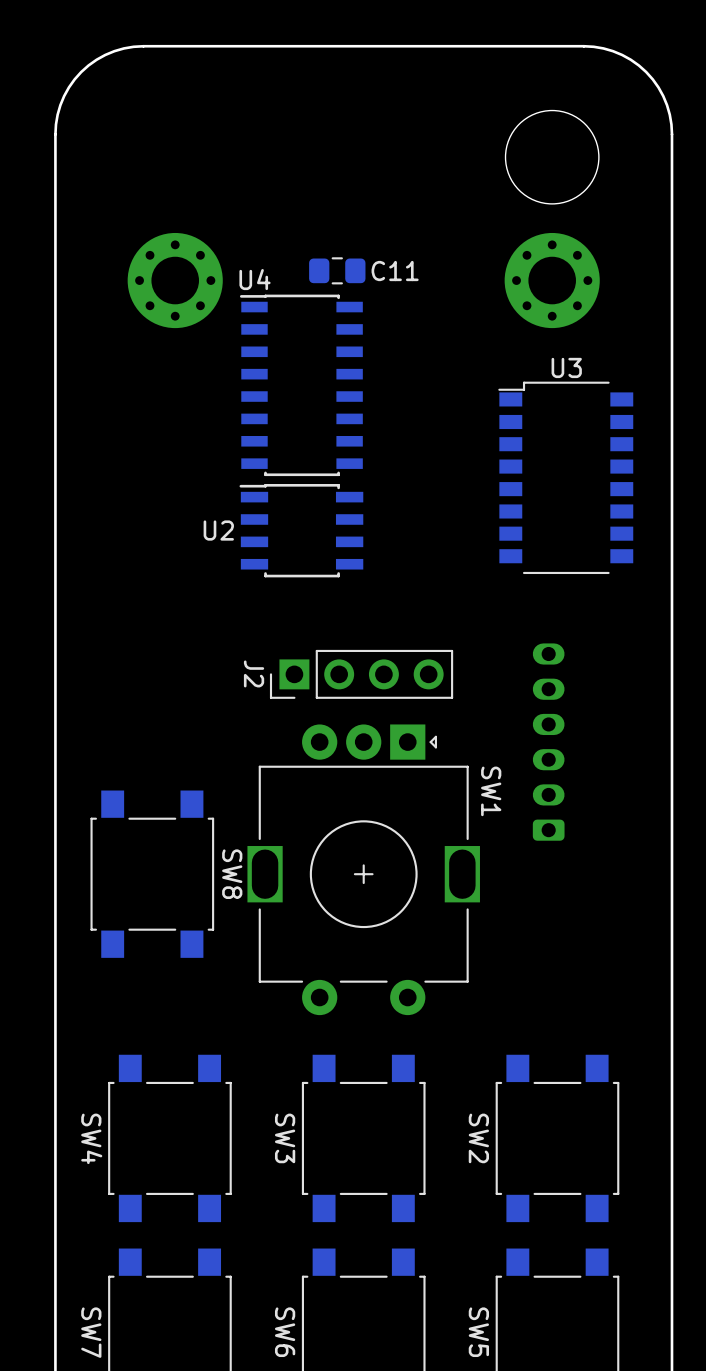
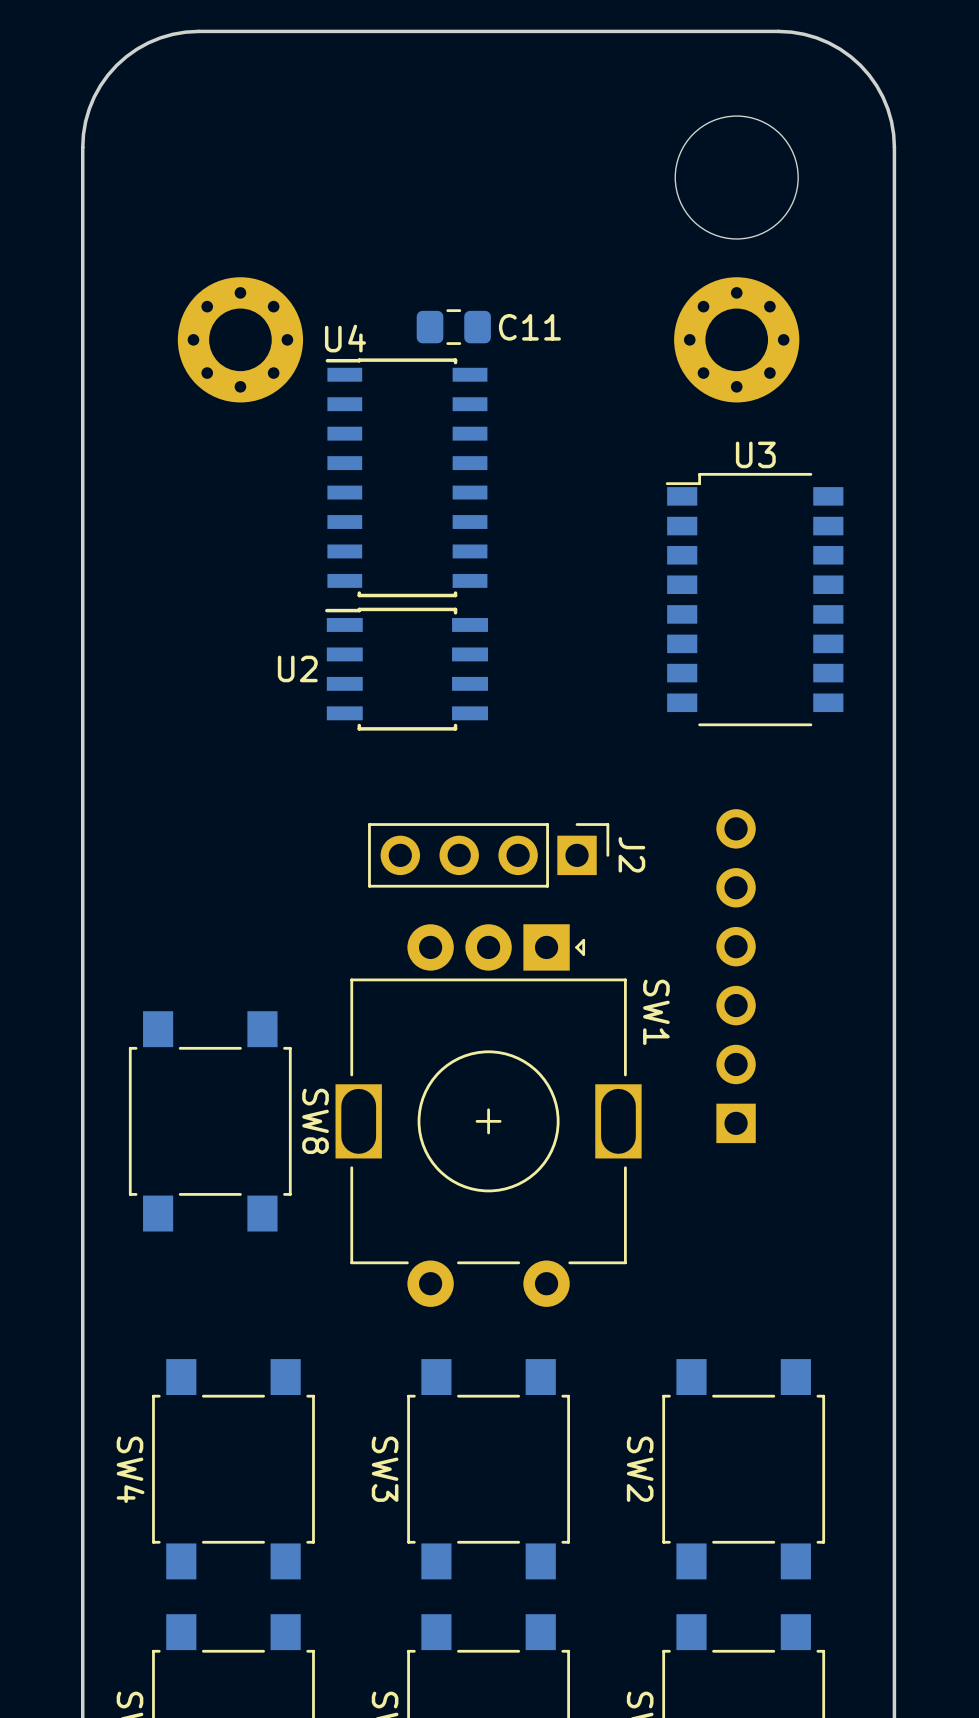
J2 rotation: 0° (361, 674) -> 180° (488, 855)
part: (548, 742) -> none
part: none -> (736, 976)

